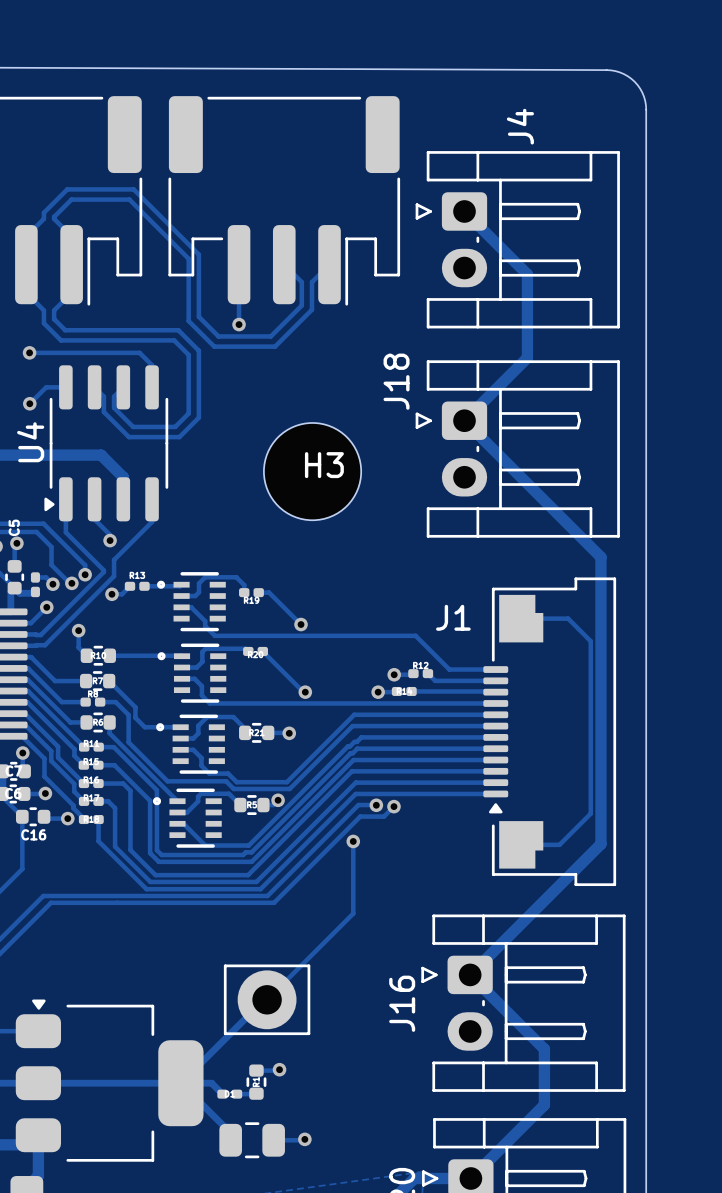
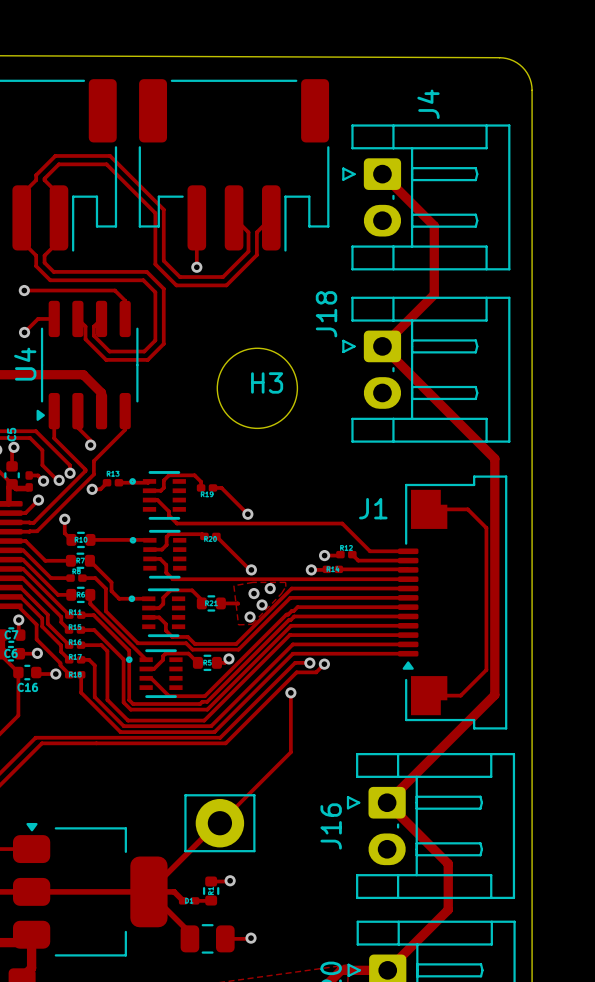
zone outline: none -> (252, 582) (285, 582) (285, 586) (252, 624) (238, 624) (233, 585) (252, 582)
via: none -> (270, 588)
via: none -> (254, 593)
via: (289, 733) -> none
via: none -> (262, 604)
via: none -> (250, 617)

